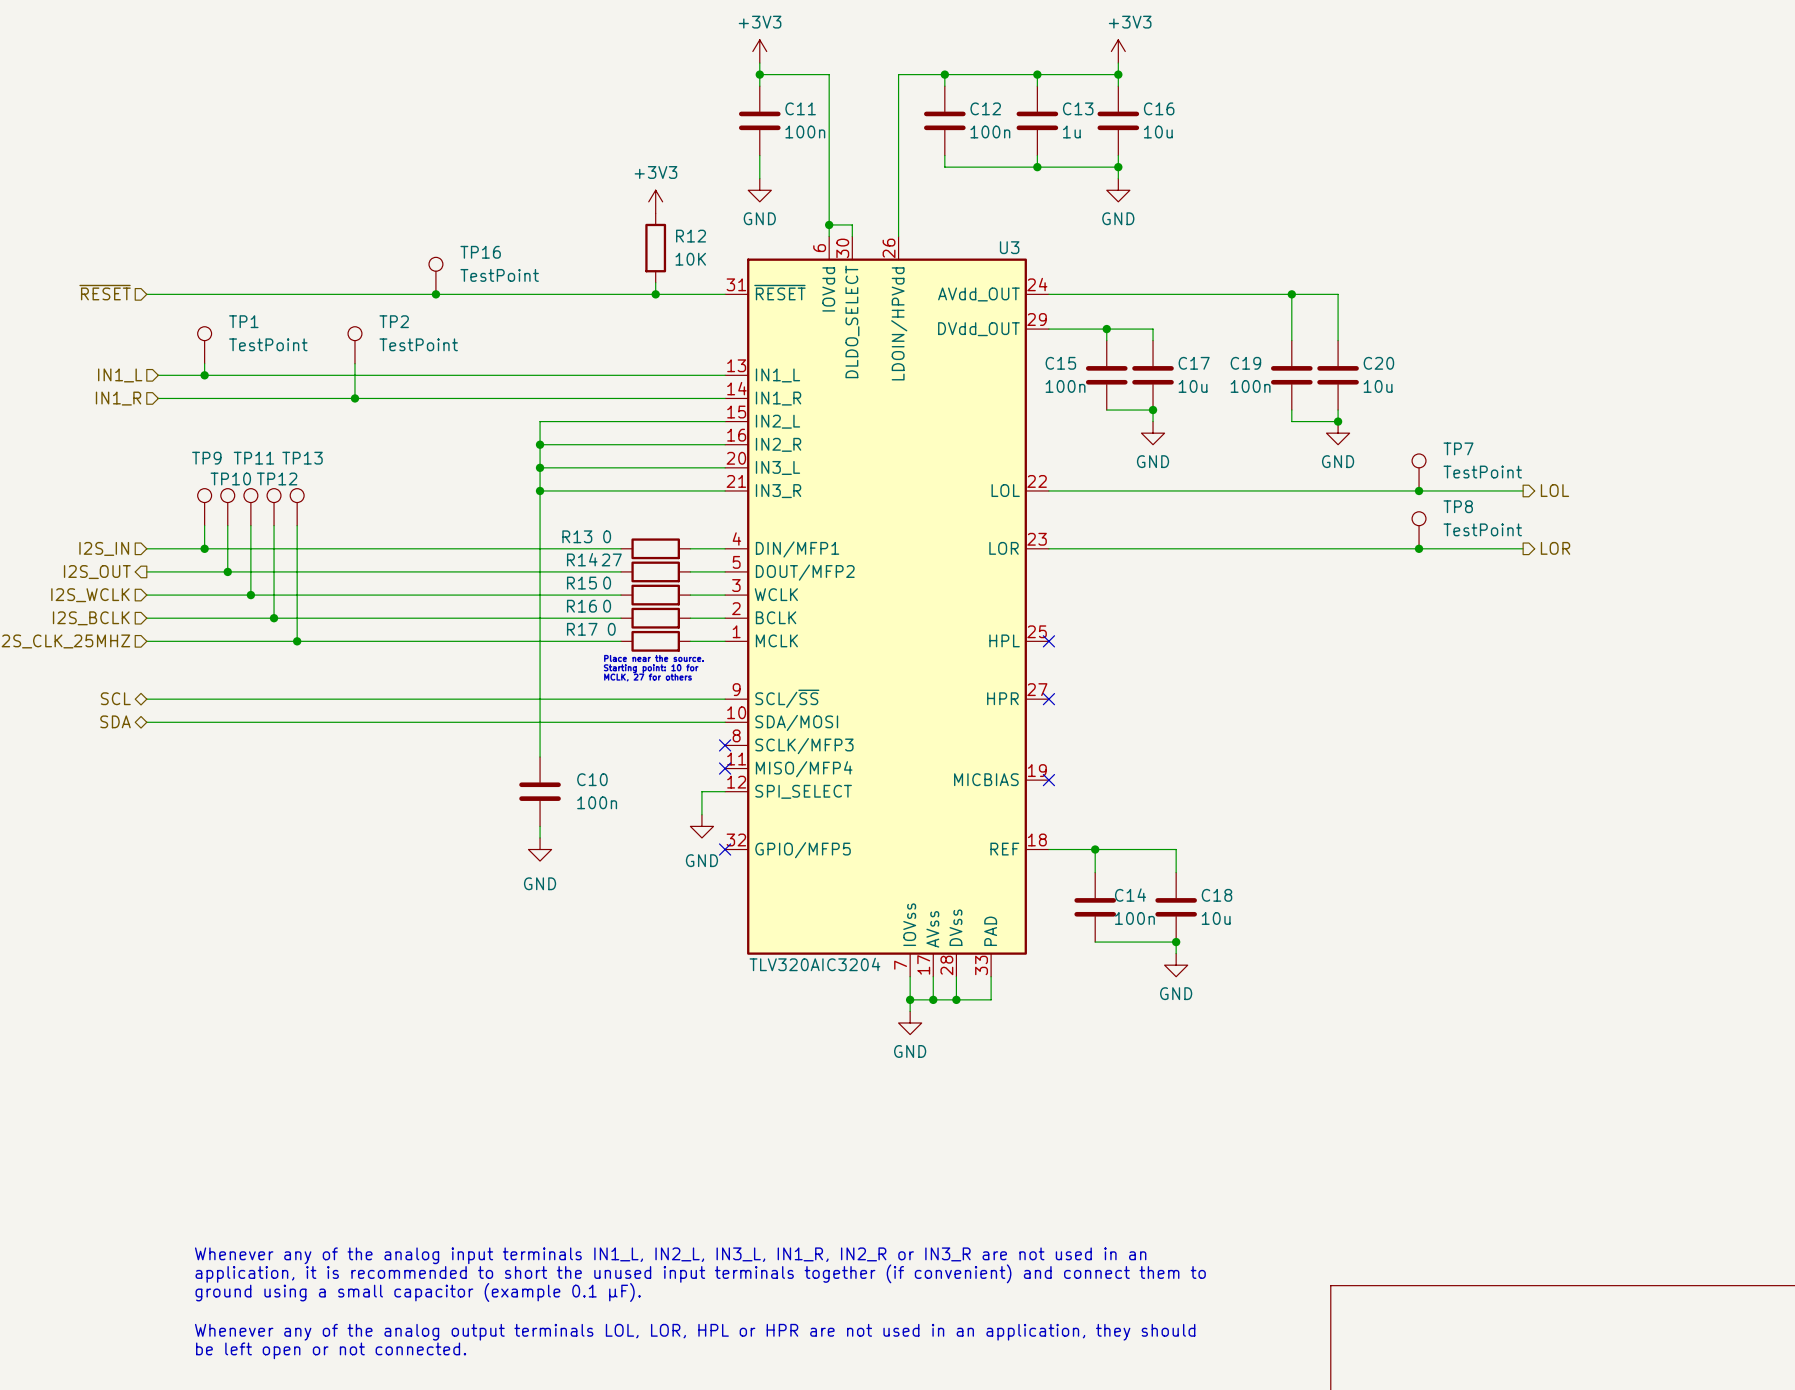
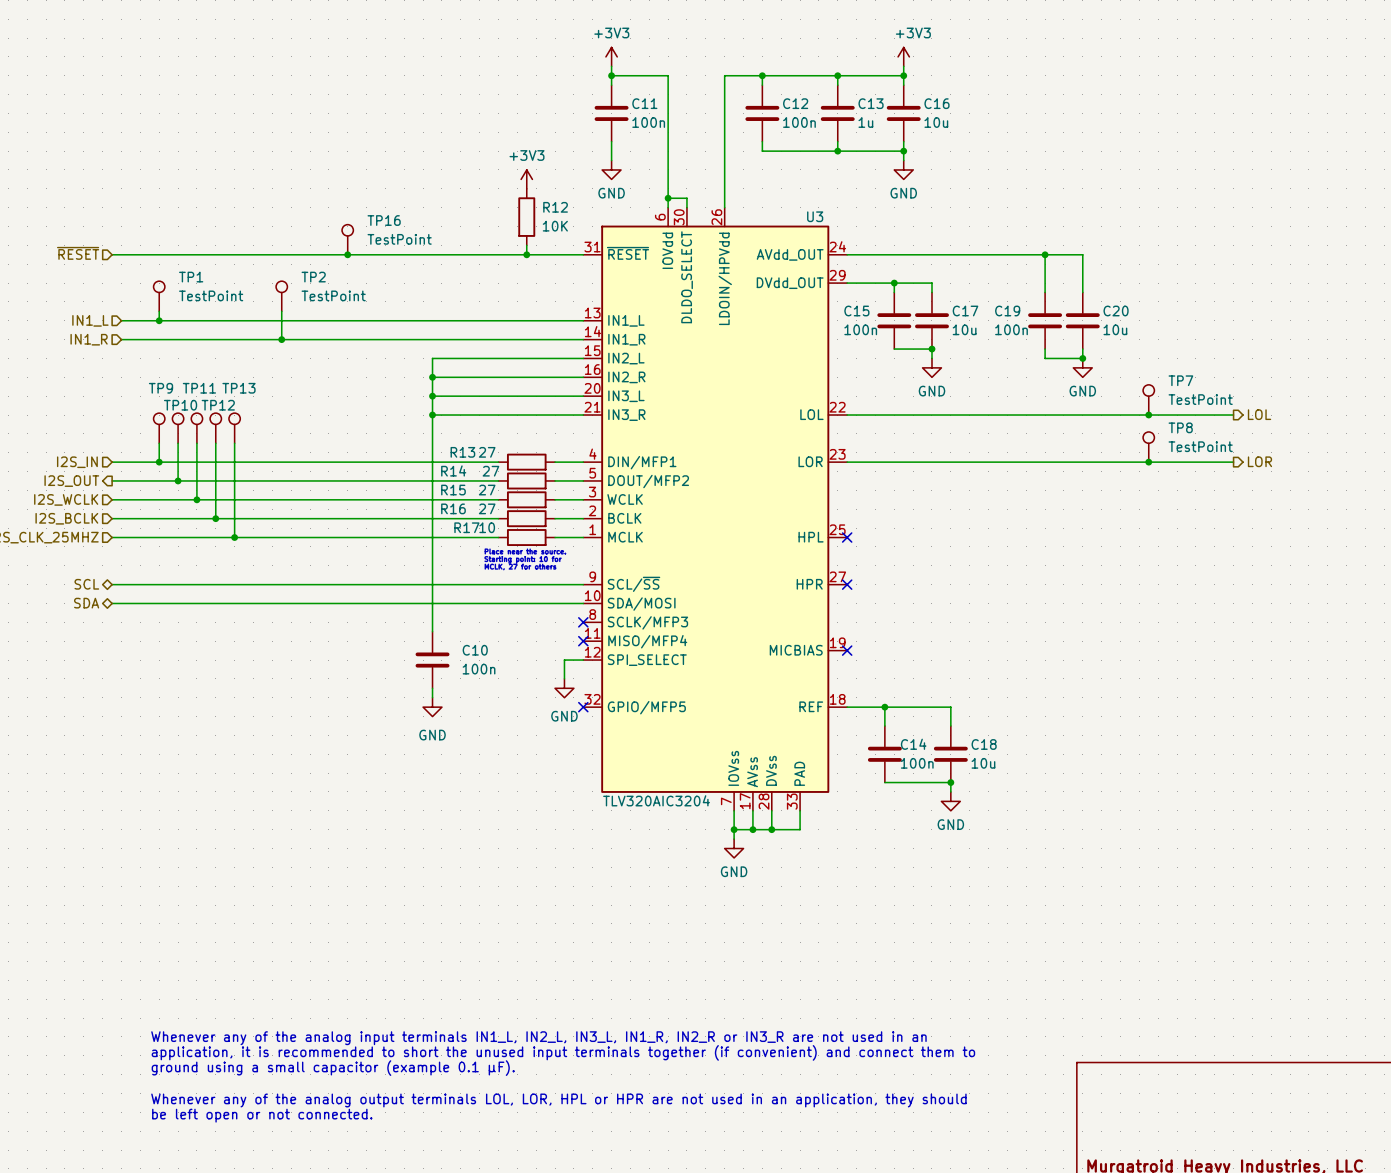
R13 value: 0 (607, 536) -> 27 (487, 452)
R14 name position: R14 (582, 559) -> R14 (453, 470)
R15 name position: R15 (581, 583) -> R15 (453, 490)
R15 value: 0 (607, 583) -> 27 (487, 490)
R16 name position: R16 (581, 606) -> R16 (453, 508)
R16 value: 0 (607, 606) -> 27 (487, 508)
R17 value: 0 (611, 629) -> 10 (487, 527)

